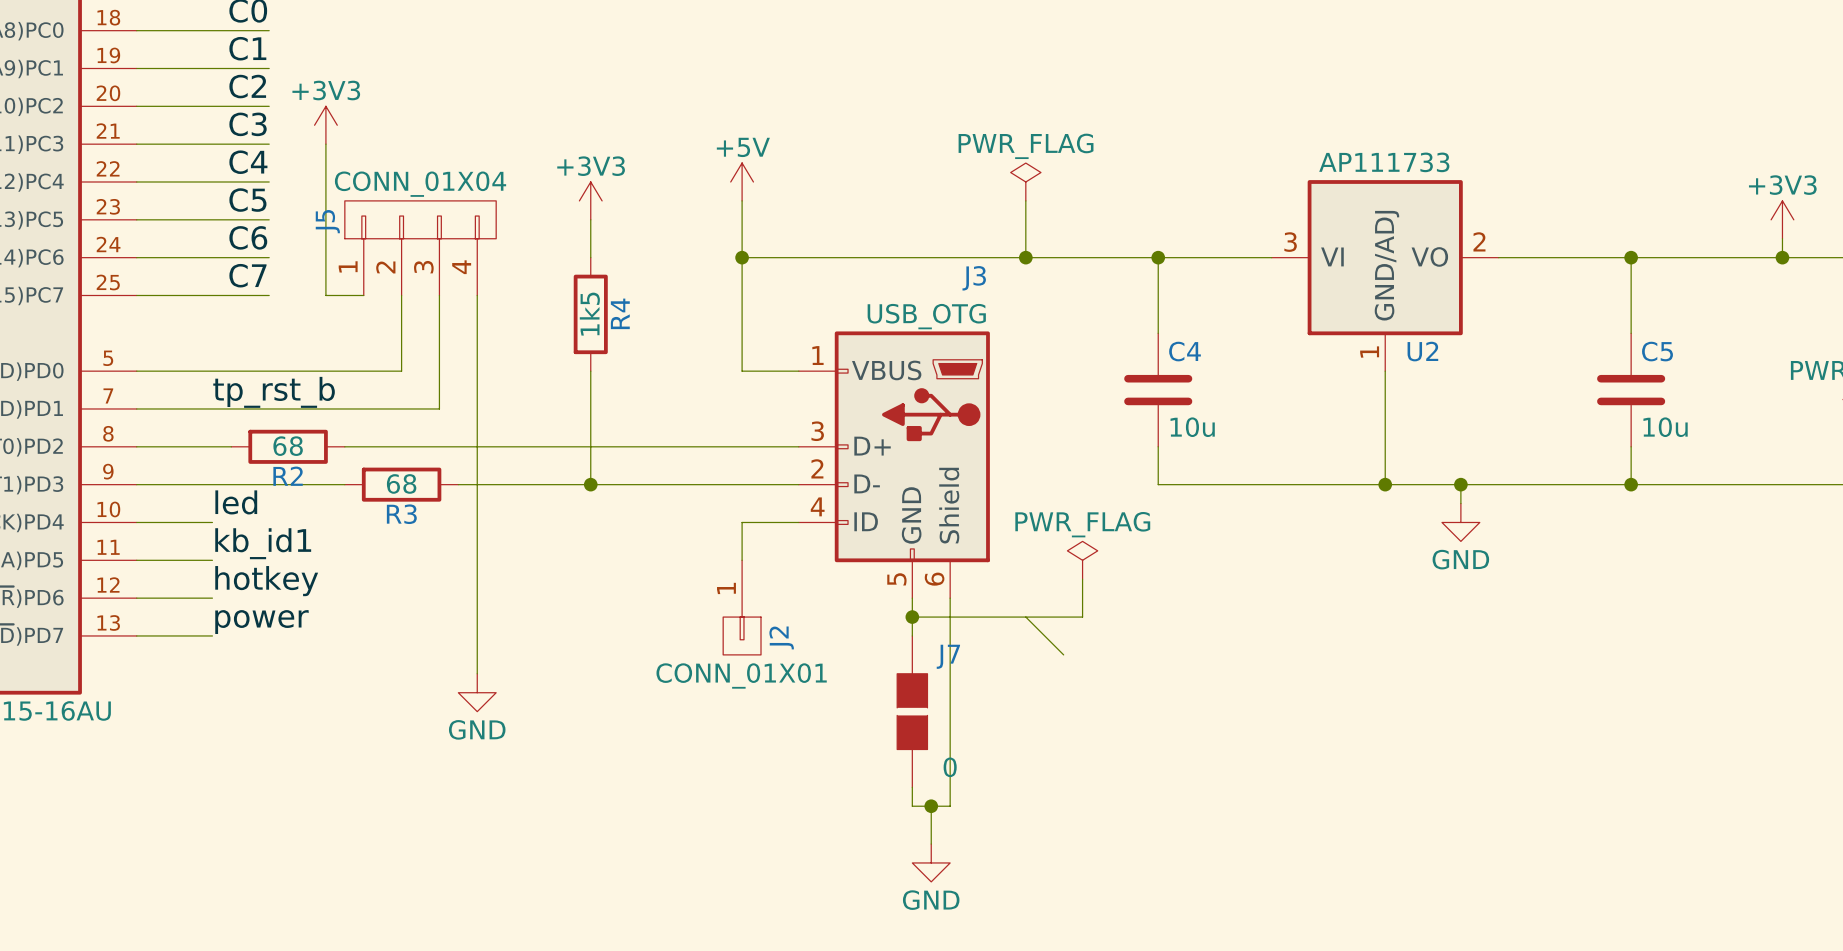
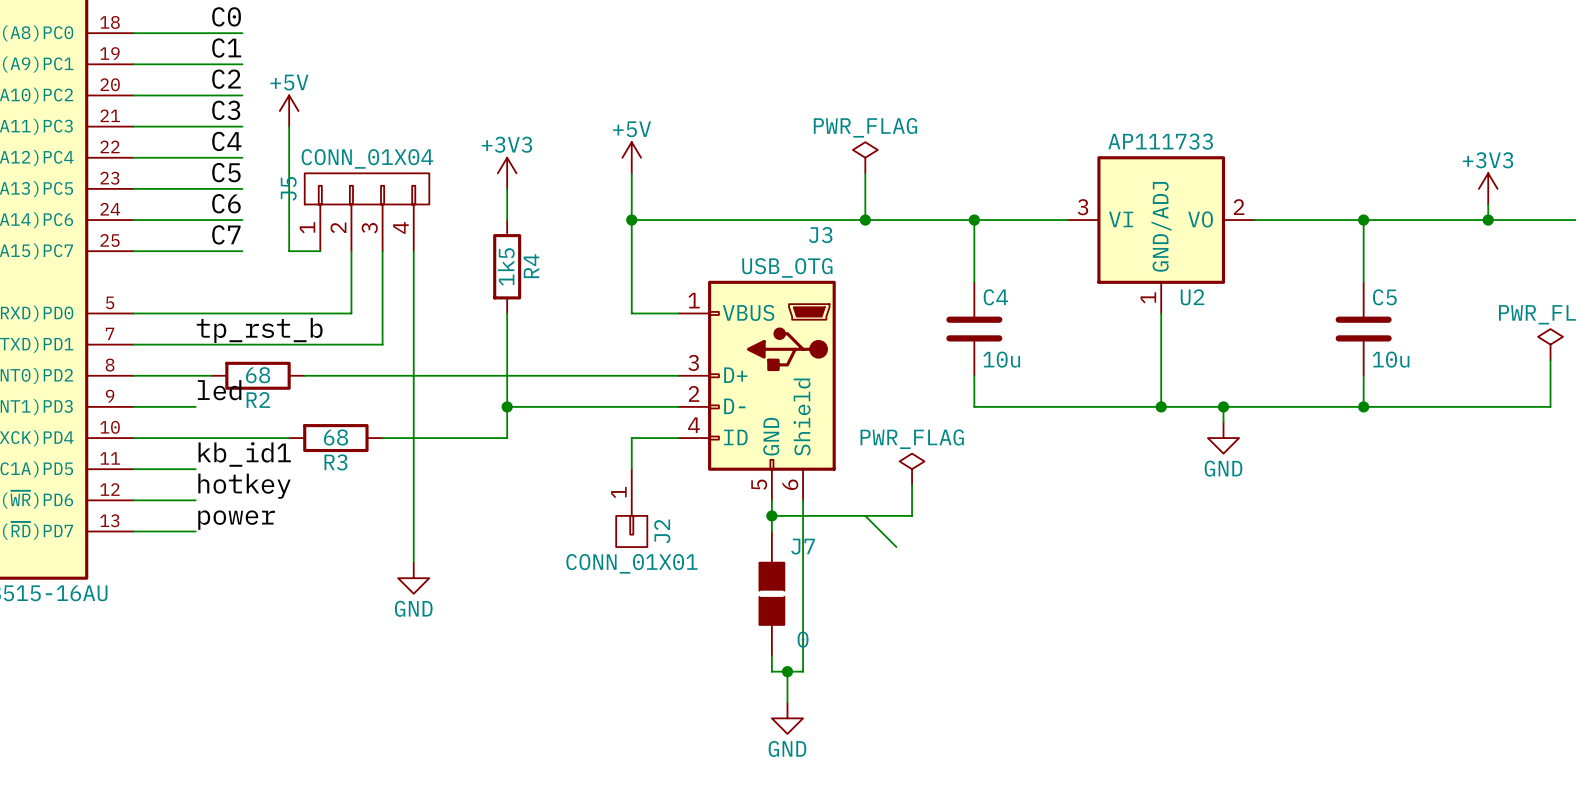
power symbol: +3V3 (325, 125) -> +5V (289, 111)
wire: (212, 484) (344, 484) -> none
R3 position: (401, 484) -> (335, 438)
wire: (458, 484) (590, 484) -> (382, 438) (507, 438) (507, 406)
label position: led (236, 502) -> led (219, 390)
wire: none -> (195, 438) (289, 438)

